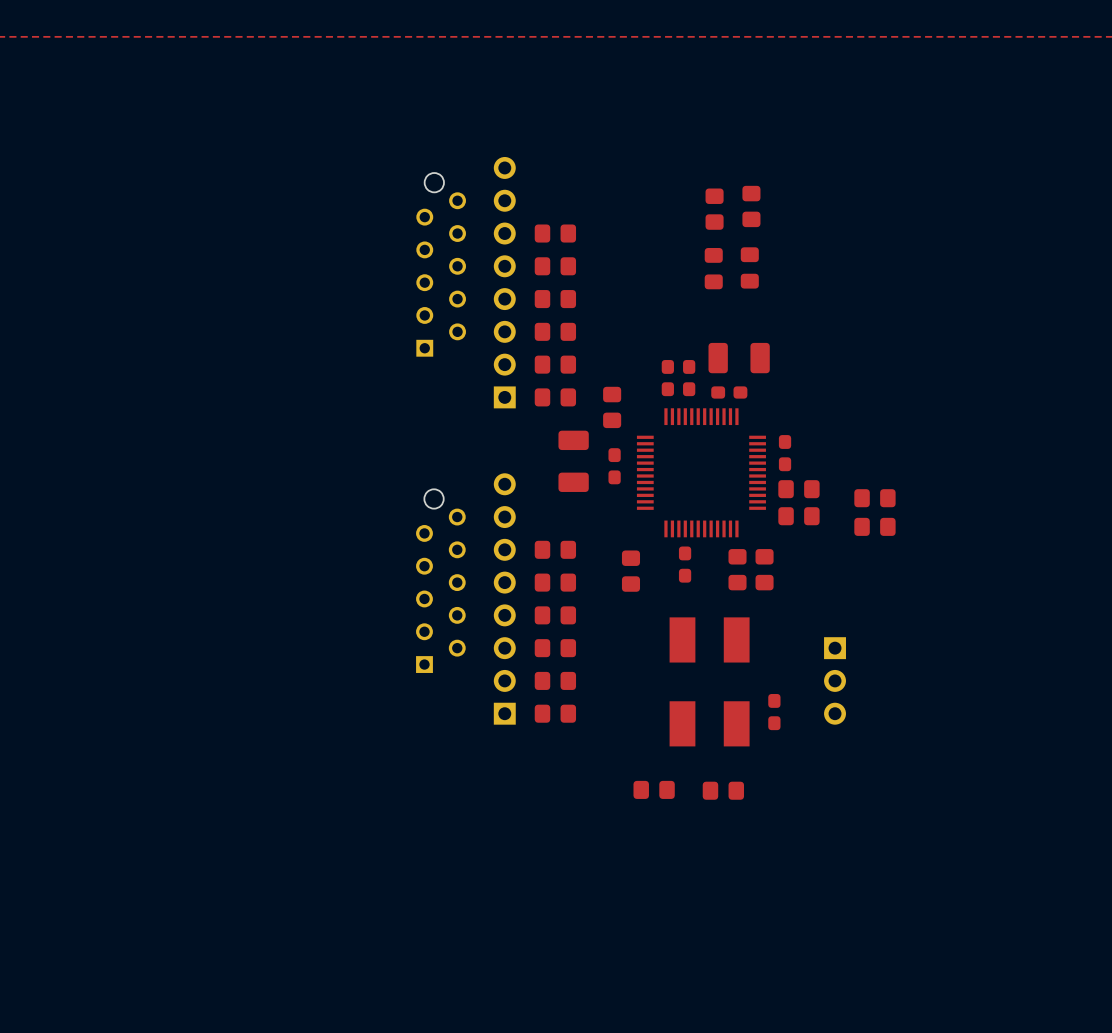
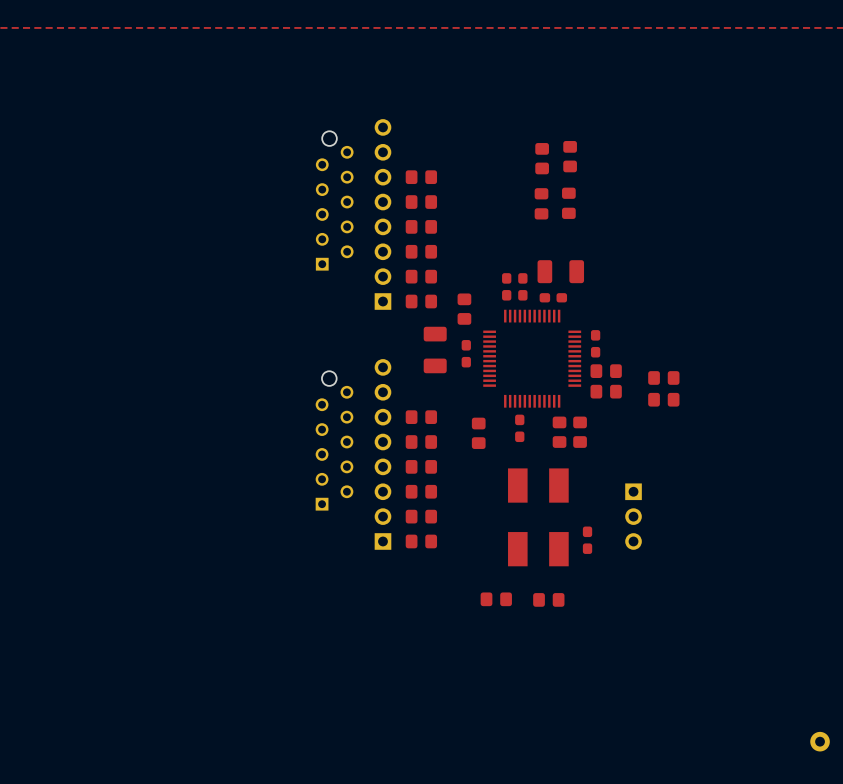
part: none -> (820, 741)

